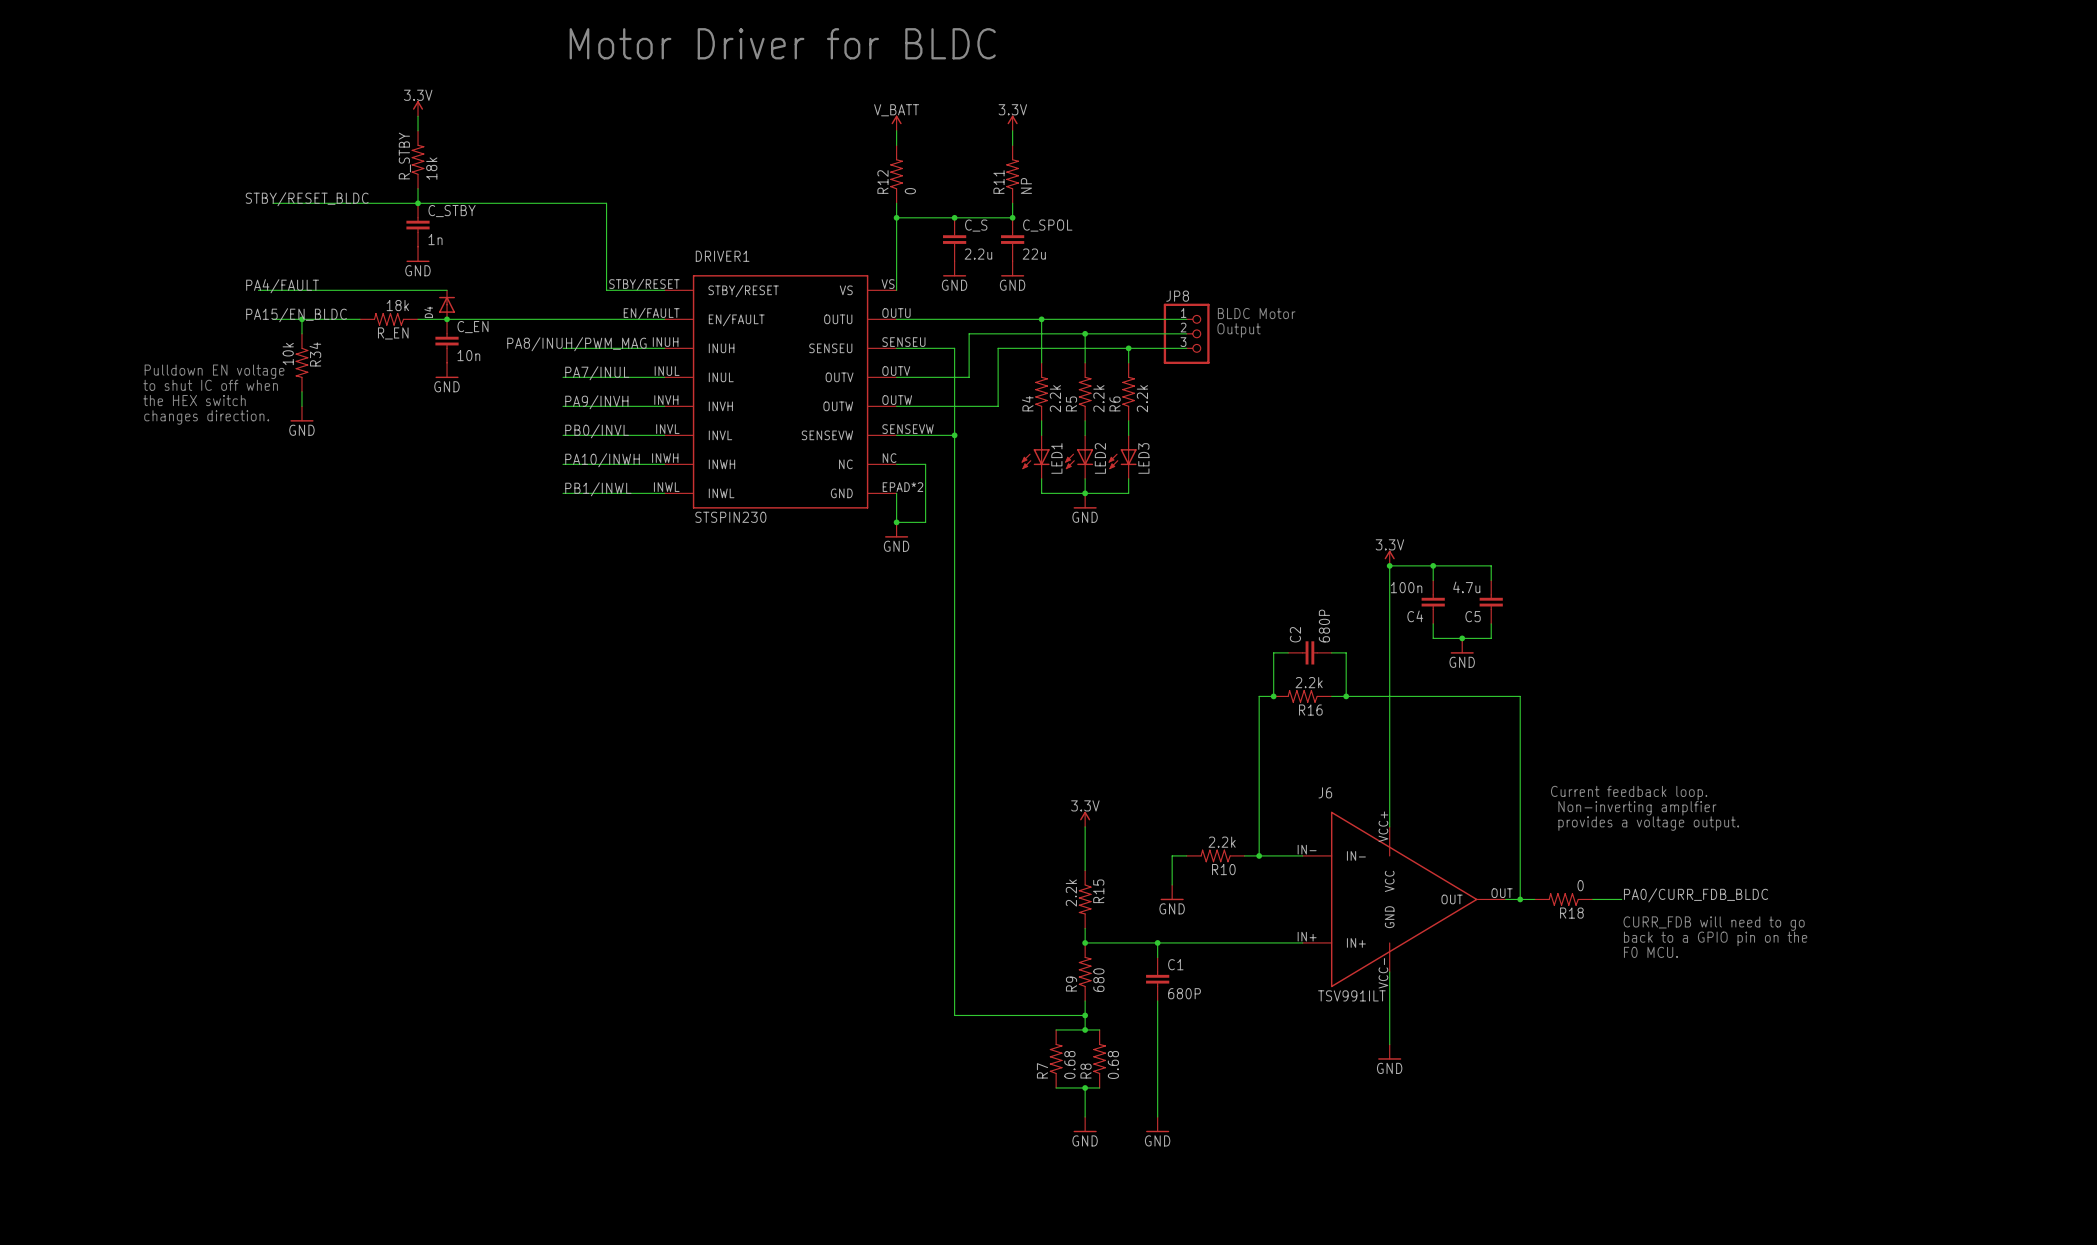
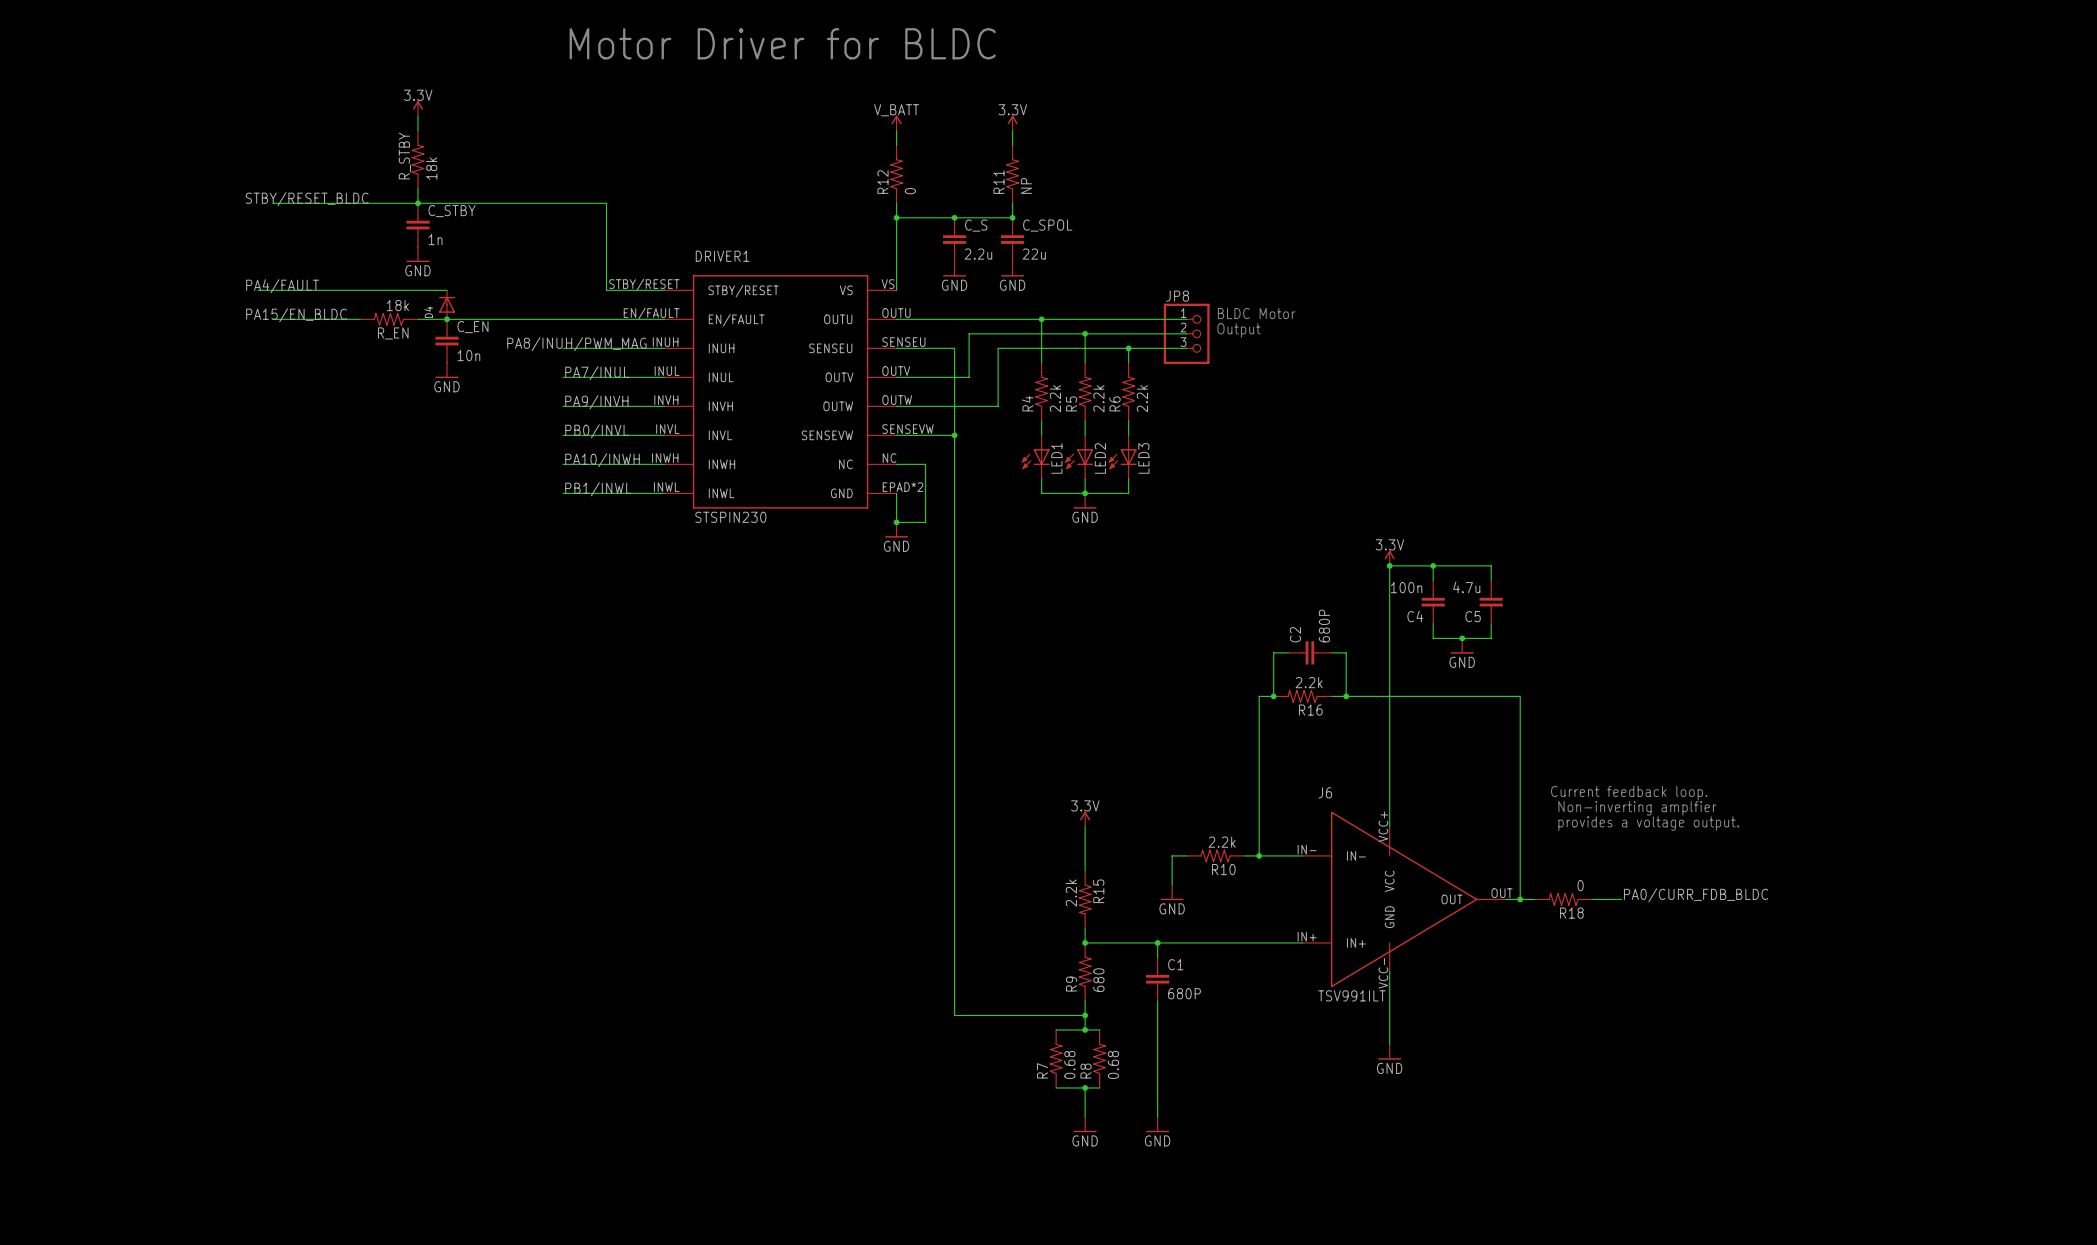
wire: (301, 319) (301, 333) -> none
junction: (301, 319) -> none
R34: 10k (301, 362) -> none
text: Pulldown EN voltage (214, 371) -> none
text: to shut IC off when (210, 385) -> none
wire: (301, 391) (301, 406) -> none
text: the HEX switch (194, 400) -> none
power symbol: GND (301, 413) -> none
text: changes direction. (206, 417) -> none
text: CURR_FDB will need to go (1714, 923) -> none
text: back to a GPIO pin on the (1715, 938) -> none
text: F0 MCU. (1651, 952) -> none

